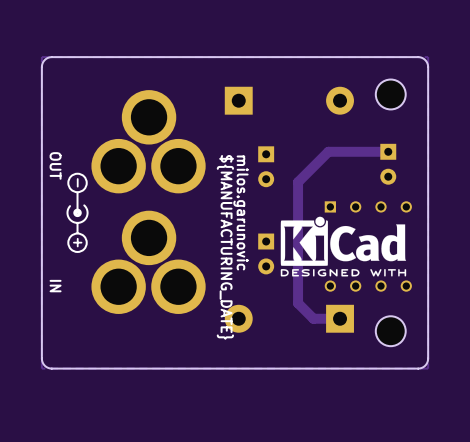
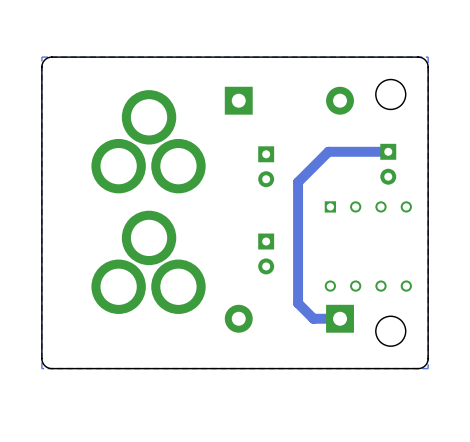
text: OUT (55, 165) -> none
drawing: [66, 172, 89, 253] -> none
text: - (77, 182) -> none
text: milos.garunovic (240, 212) -> none
drawing: [280, 216, 407, 277] -> none
text: + (77, 242) -> none
text: ${MANUFACTURING_DATE} (225, 247) -> none
text: IN (55, 286) -> none

